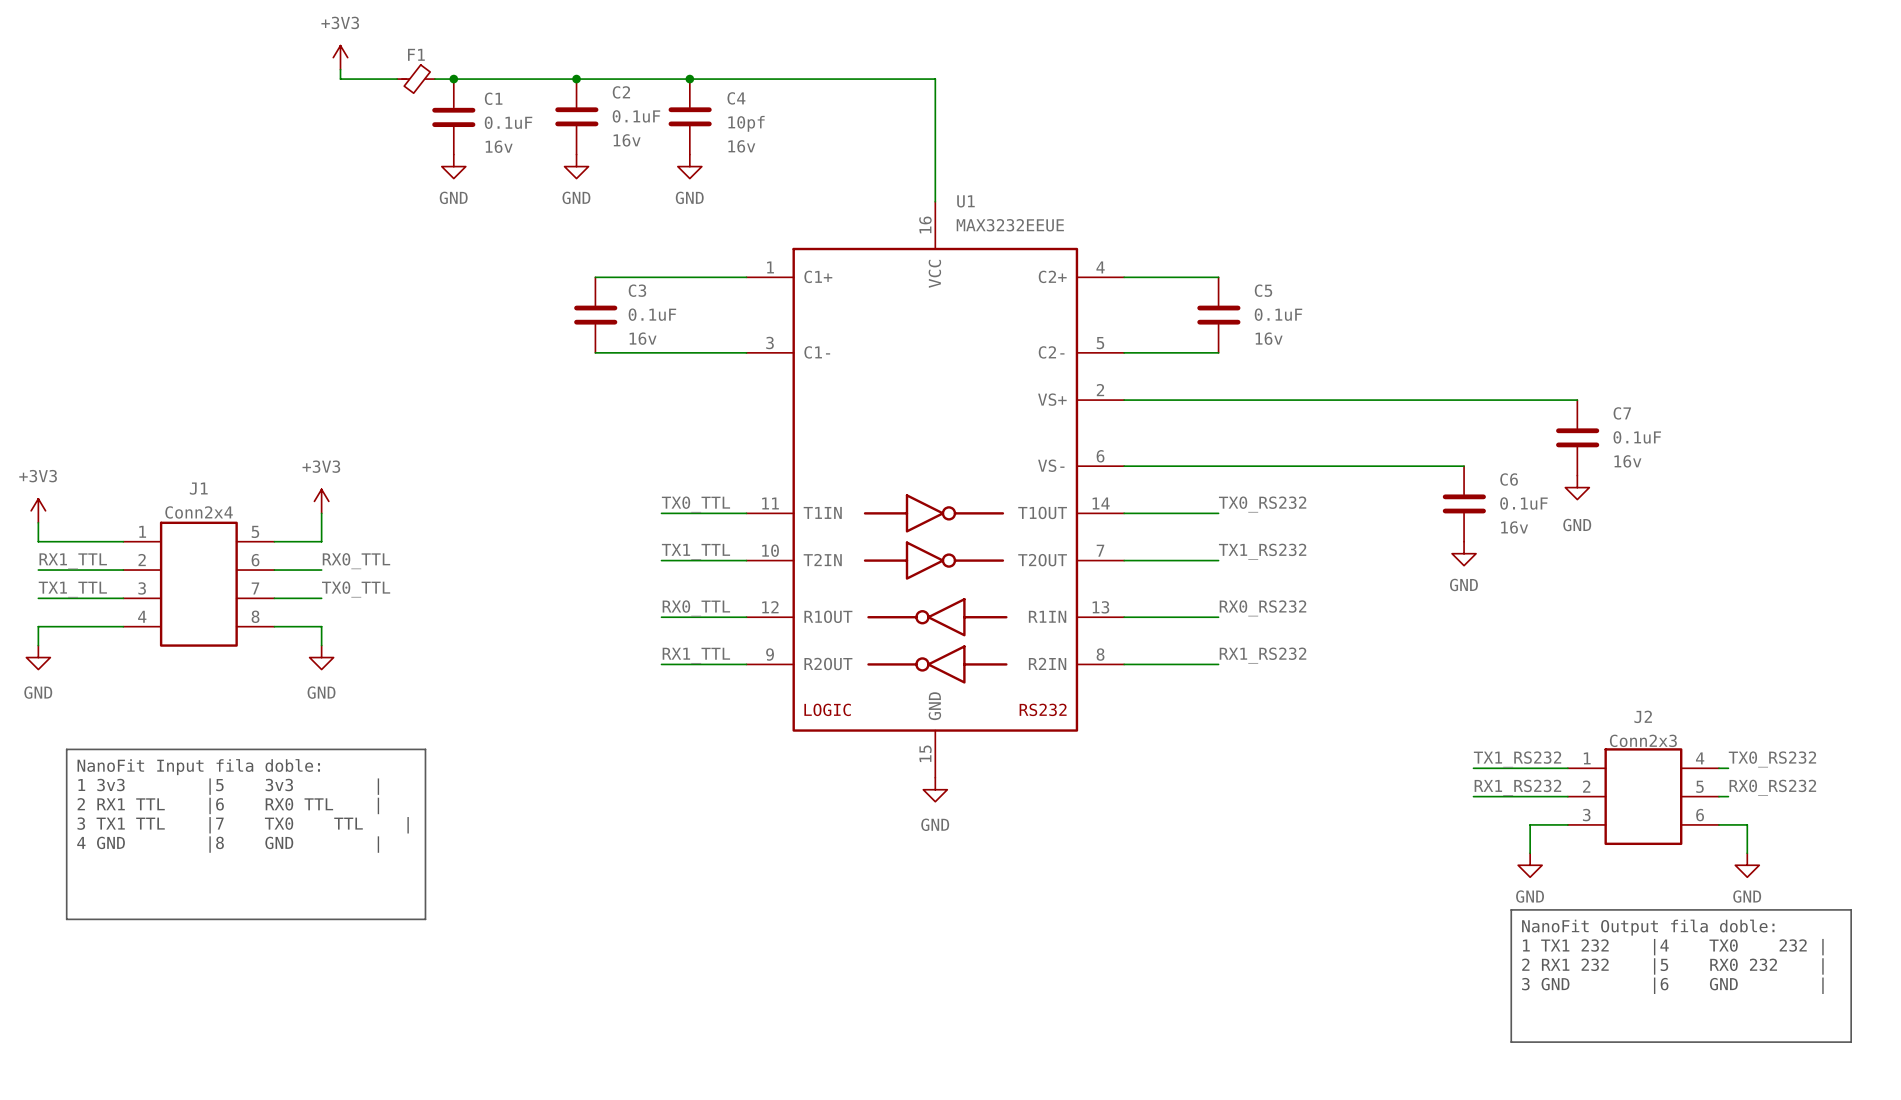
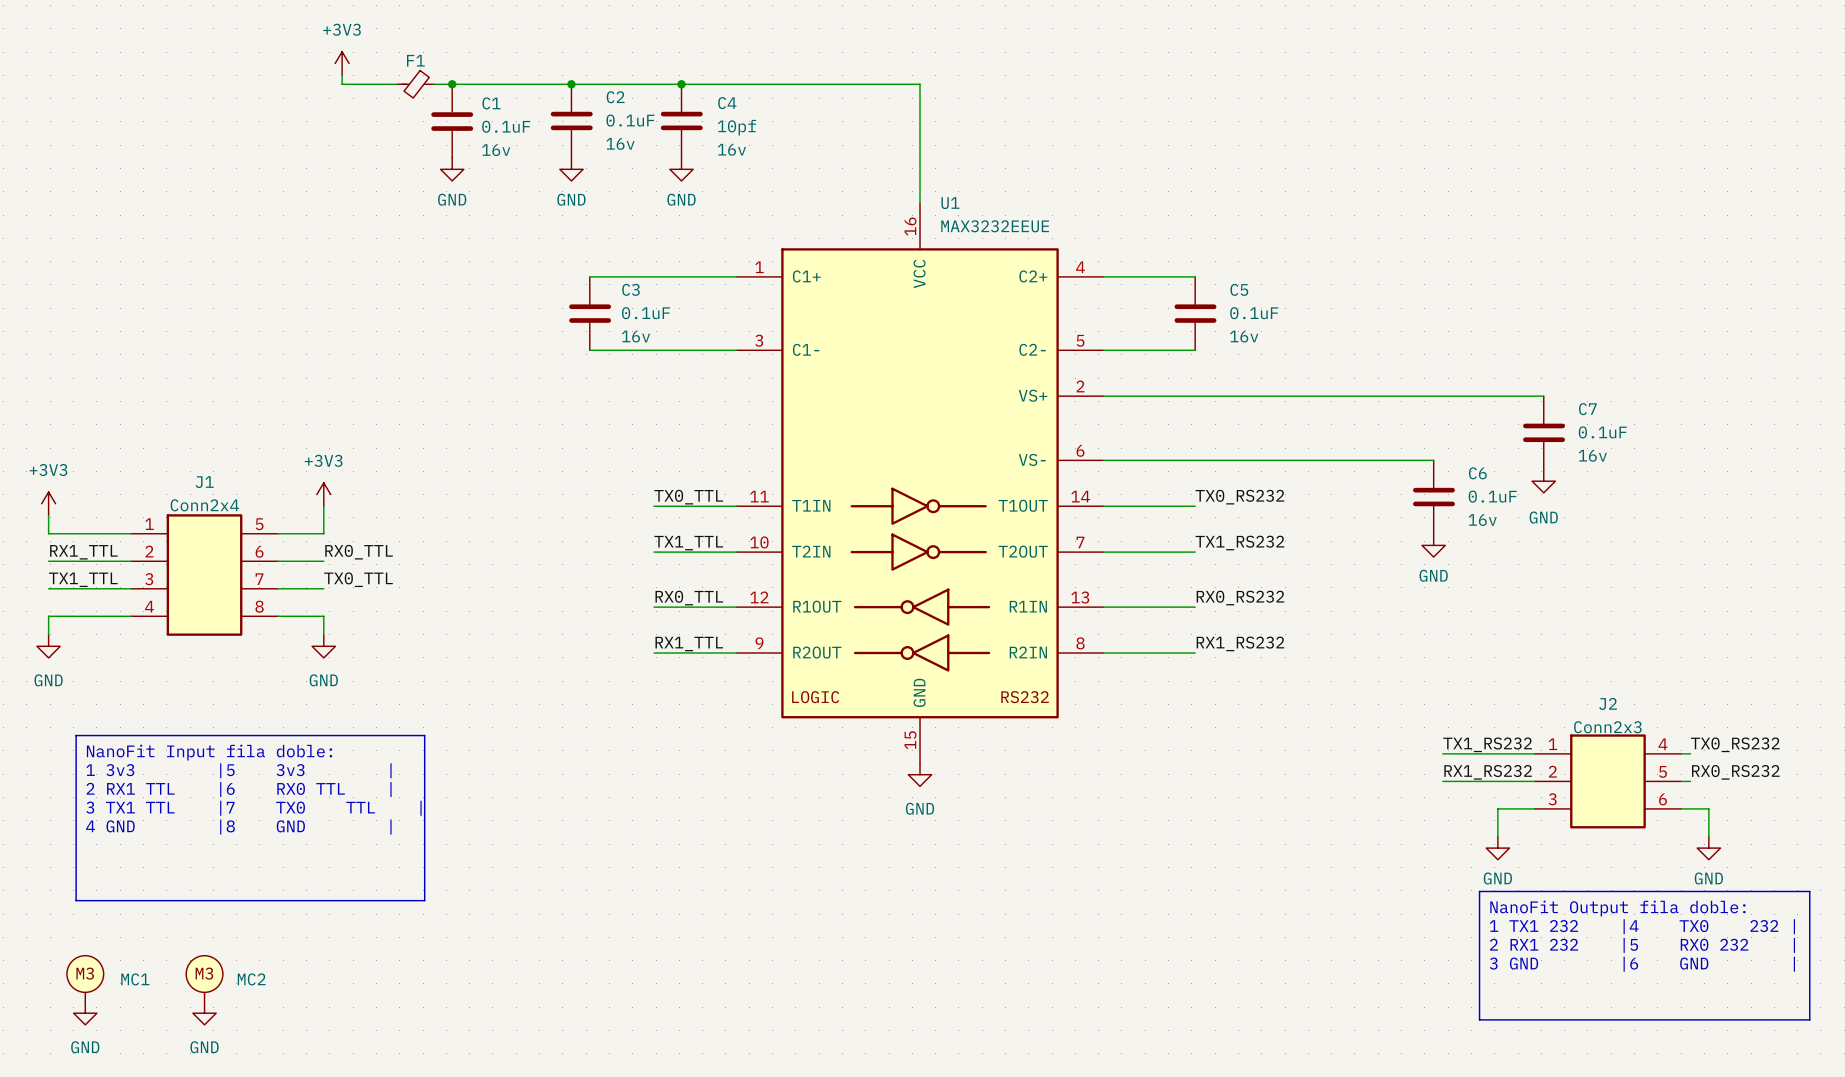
MC1: none -> (85, 978)
MC2: none -> (204, 978)
power symbol: none -> GND (85, 1013)
power symbol: none -> GND (204, 1013)

